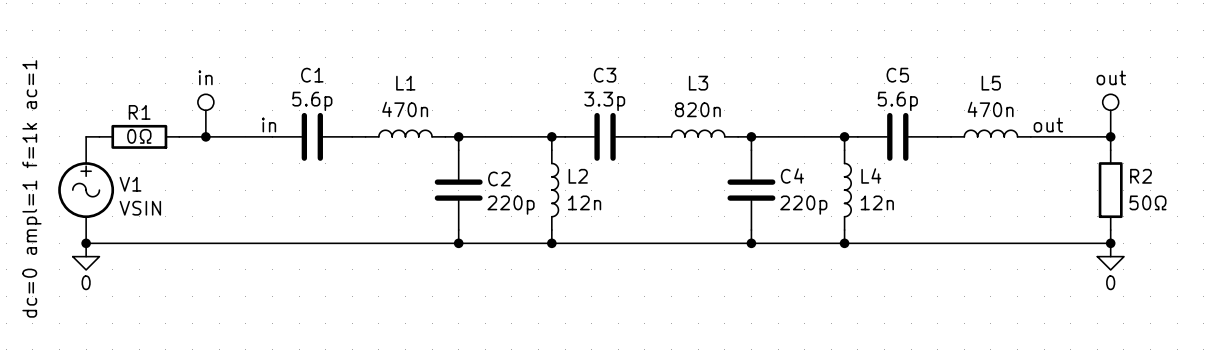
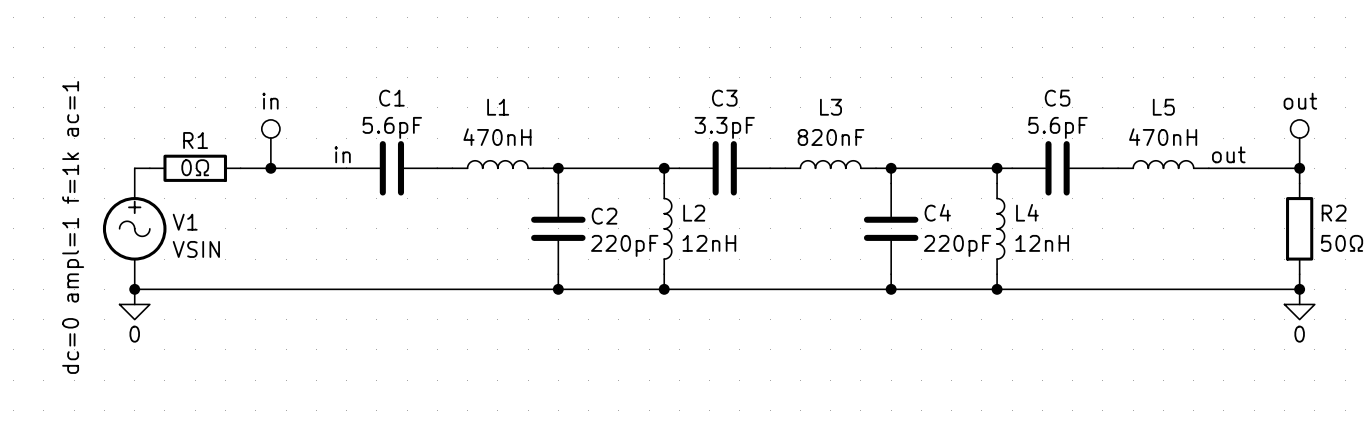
C1 value: 5.6p (312, 101) -> 5.6pF (392, 127)
C3 value: 3.3p (604, 101) -> 3.3pF (724, 127)
C5 value: 5.6p (897, 101) -> 5.6pF (1057, 127)
L1 value: 470n (405, 109) -> 470nH (497, 137)
L3 value: 820n (697, 109) -> 820nF (831, 137)
L5 value: 470n (990, 109) -> 470nH (1163, 137)
L2 value: 12n (584, 202) -> 12nH (709, 243)
L4 value: 12n (877, 202) -> 12nH (1042, 243)
C2 value: 220p (511, 205) -> 220pF (624, 245)
C4 value: 220p (803, 205) -> 220pF (957, 245)

